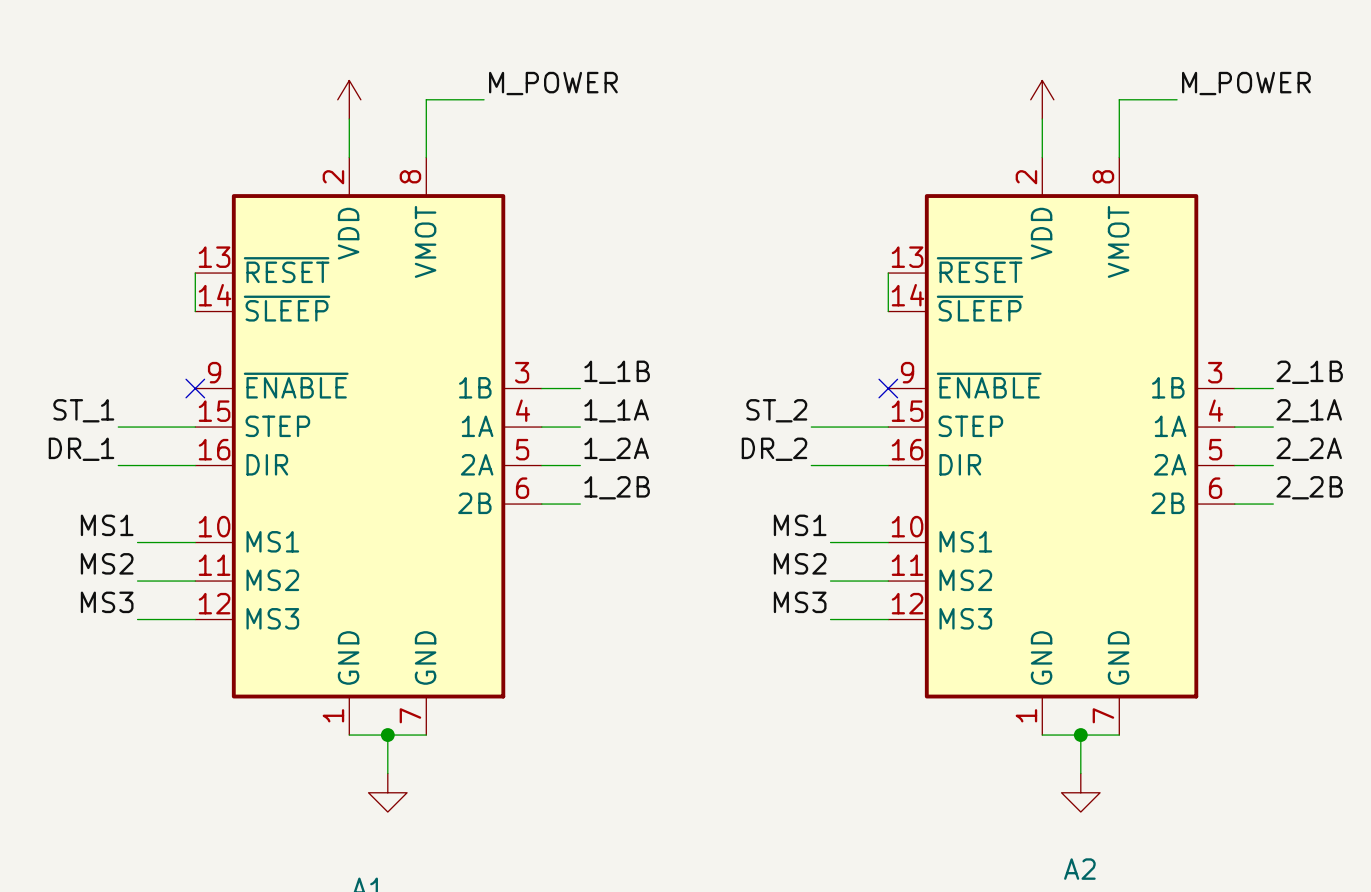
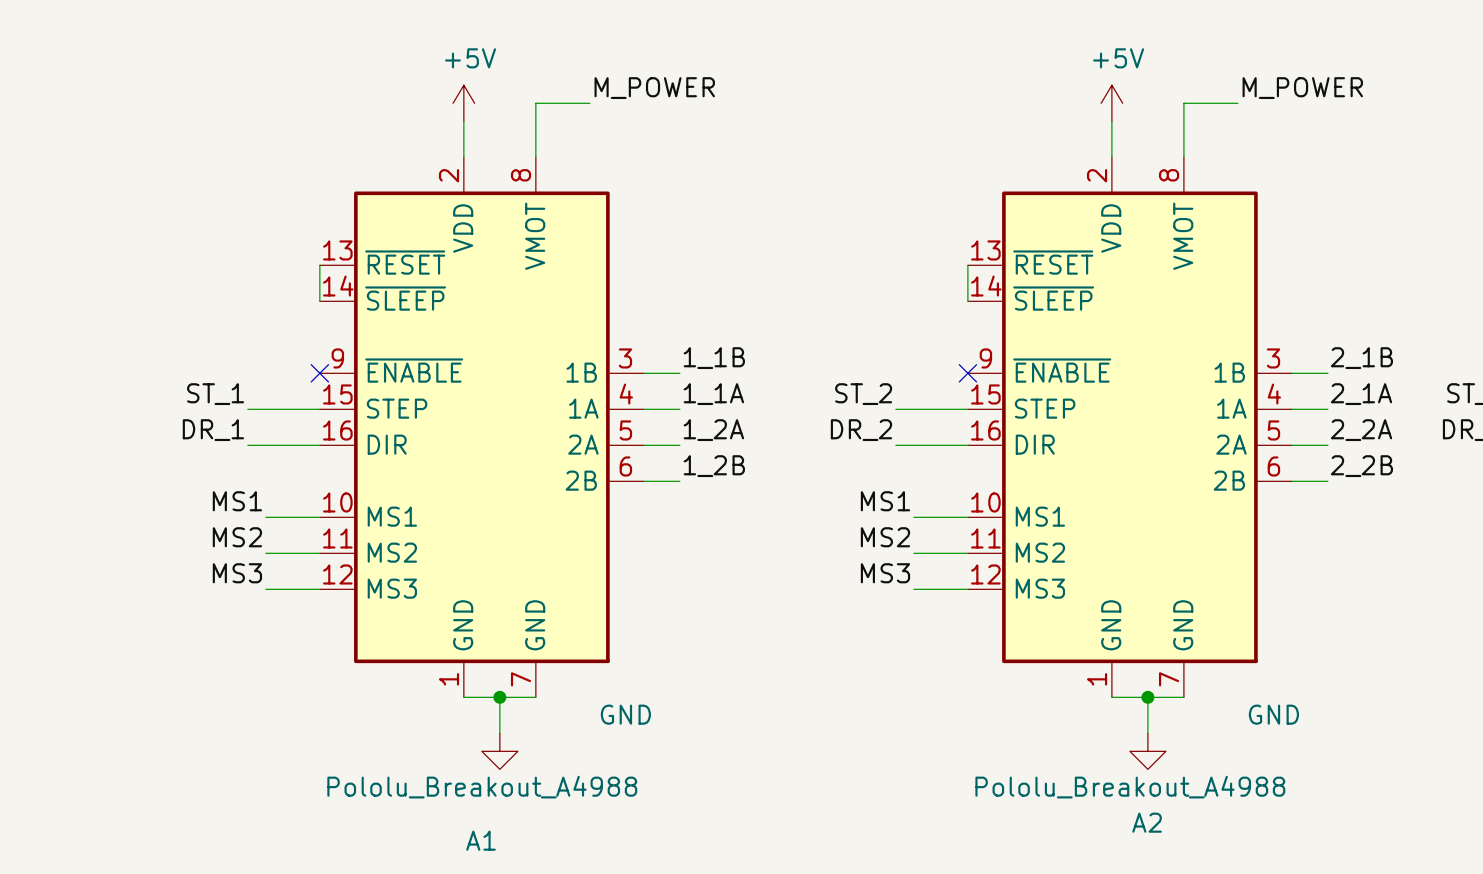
power symbol text: none -> +5V (470, 58)
power symbol text: none -> +5V (1118, 58)
power symbol text: none -> GND (625, 714)
power symbol text: none -> GND (1273, 714)
A1 value: none -> Pololu_Breakout_A4988 (482, 787)
A2 value: none -> Pololu_Breakout_A4988 (1130, 787)

